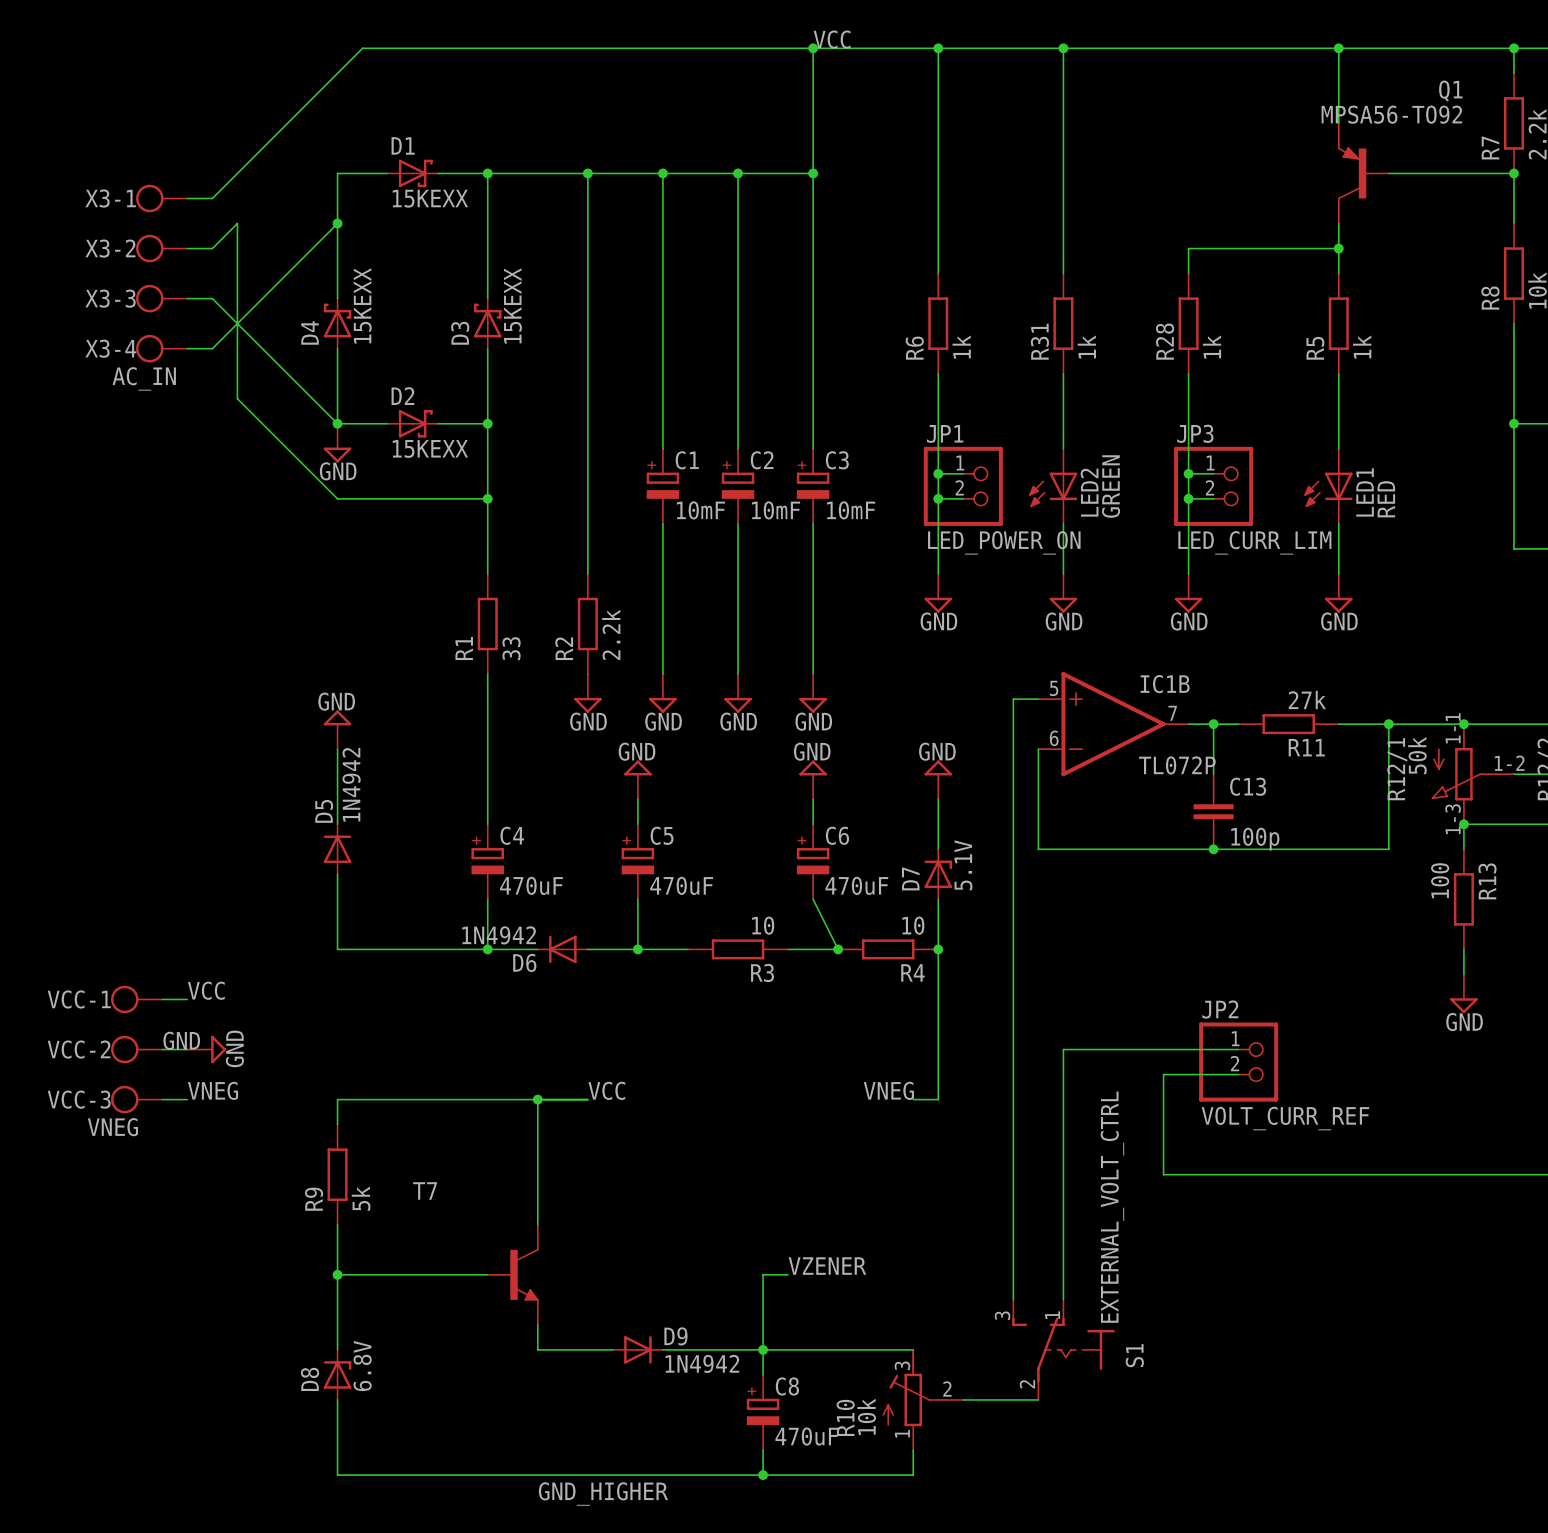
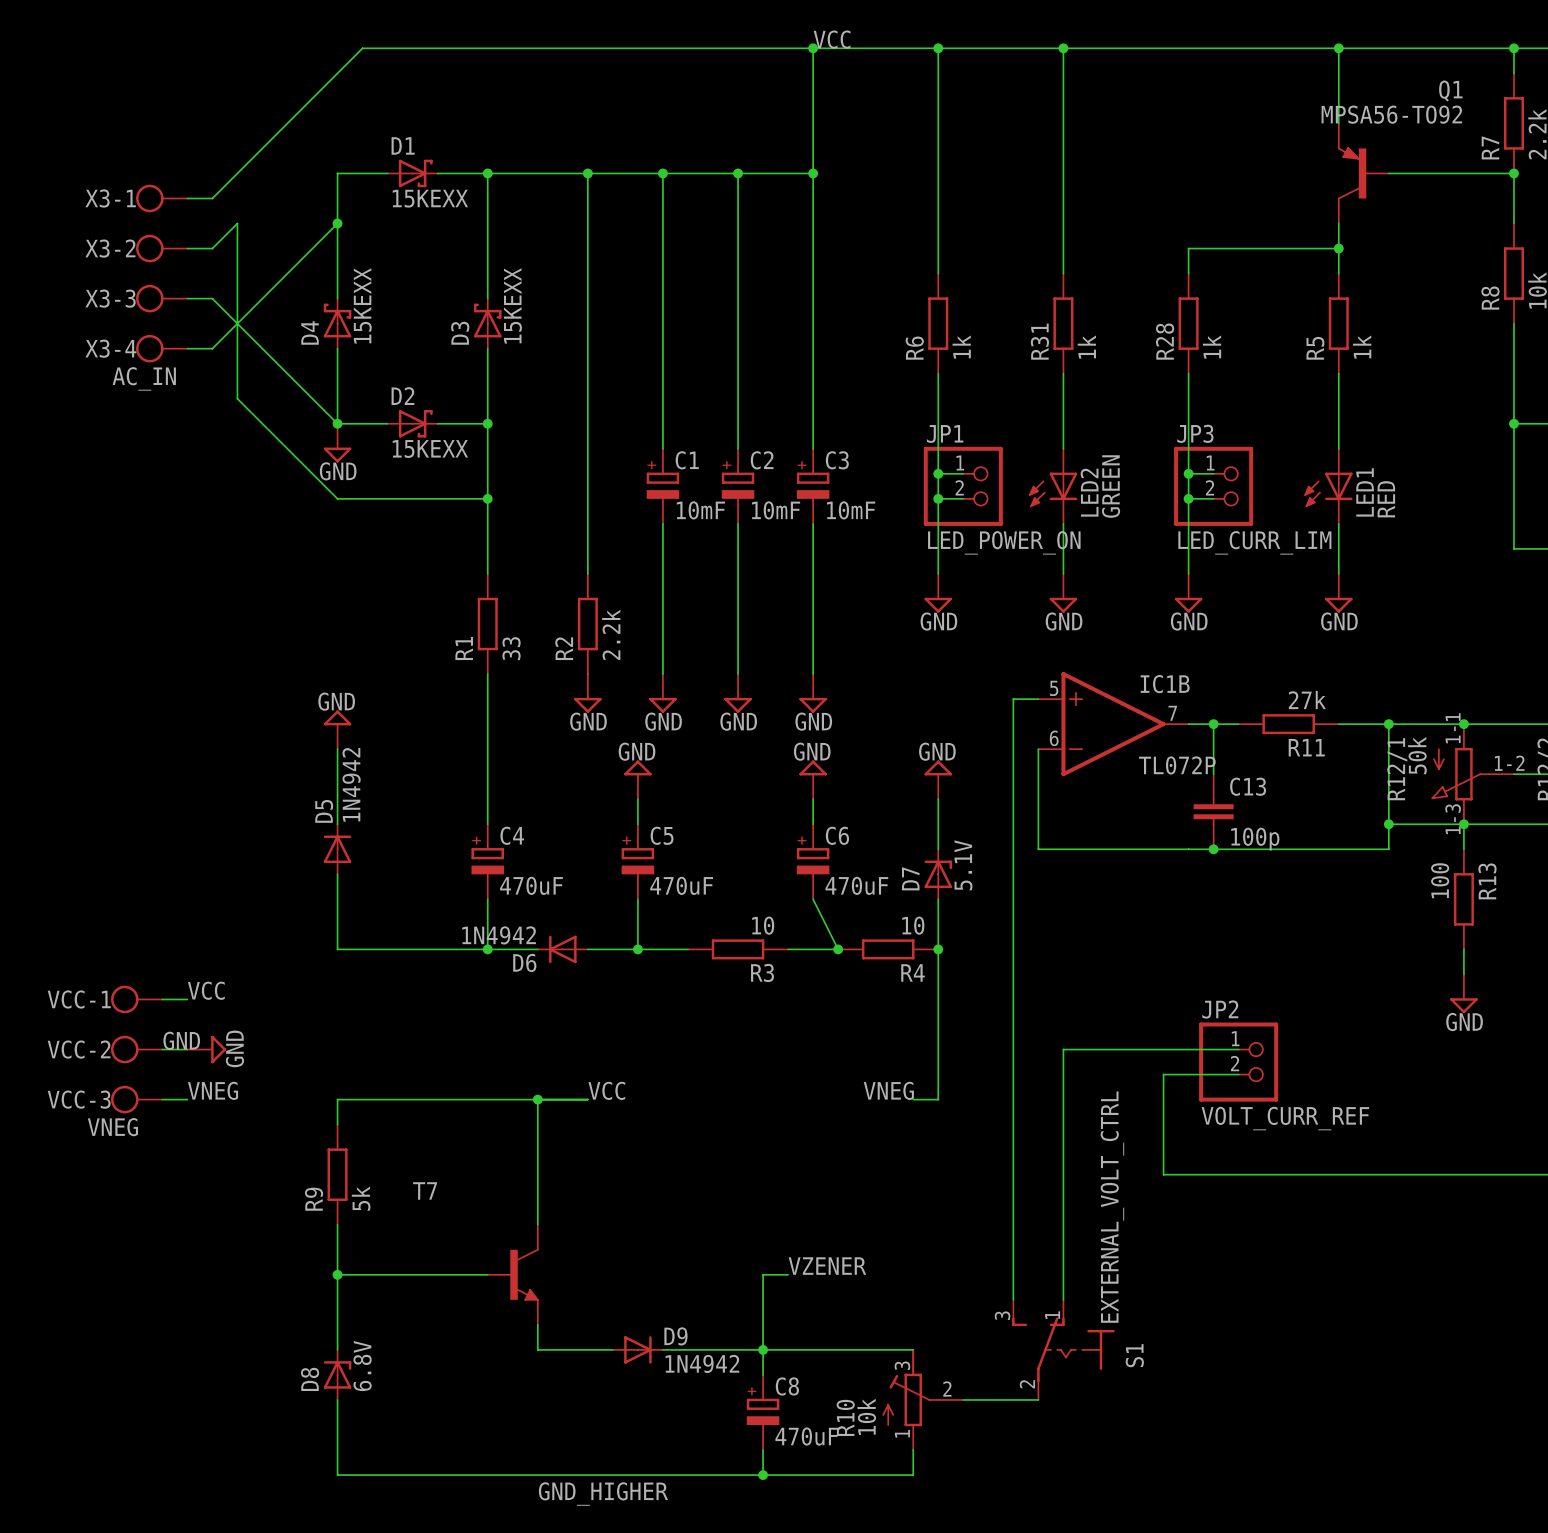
wire: none -> (1388, 824) (1463, 824)
junction: none -> (1388, 824)

